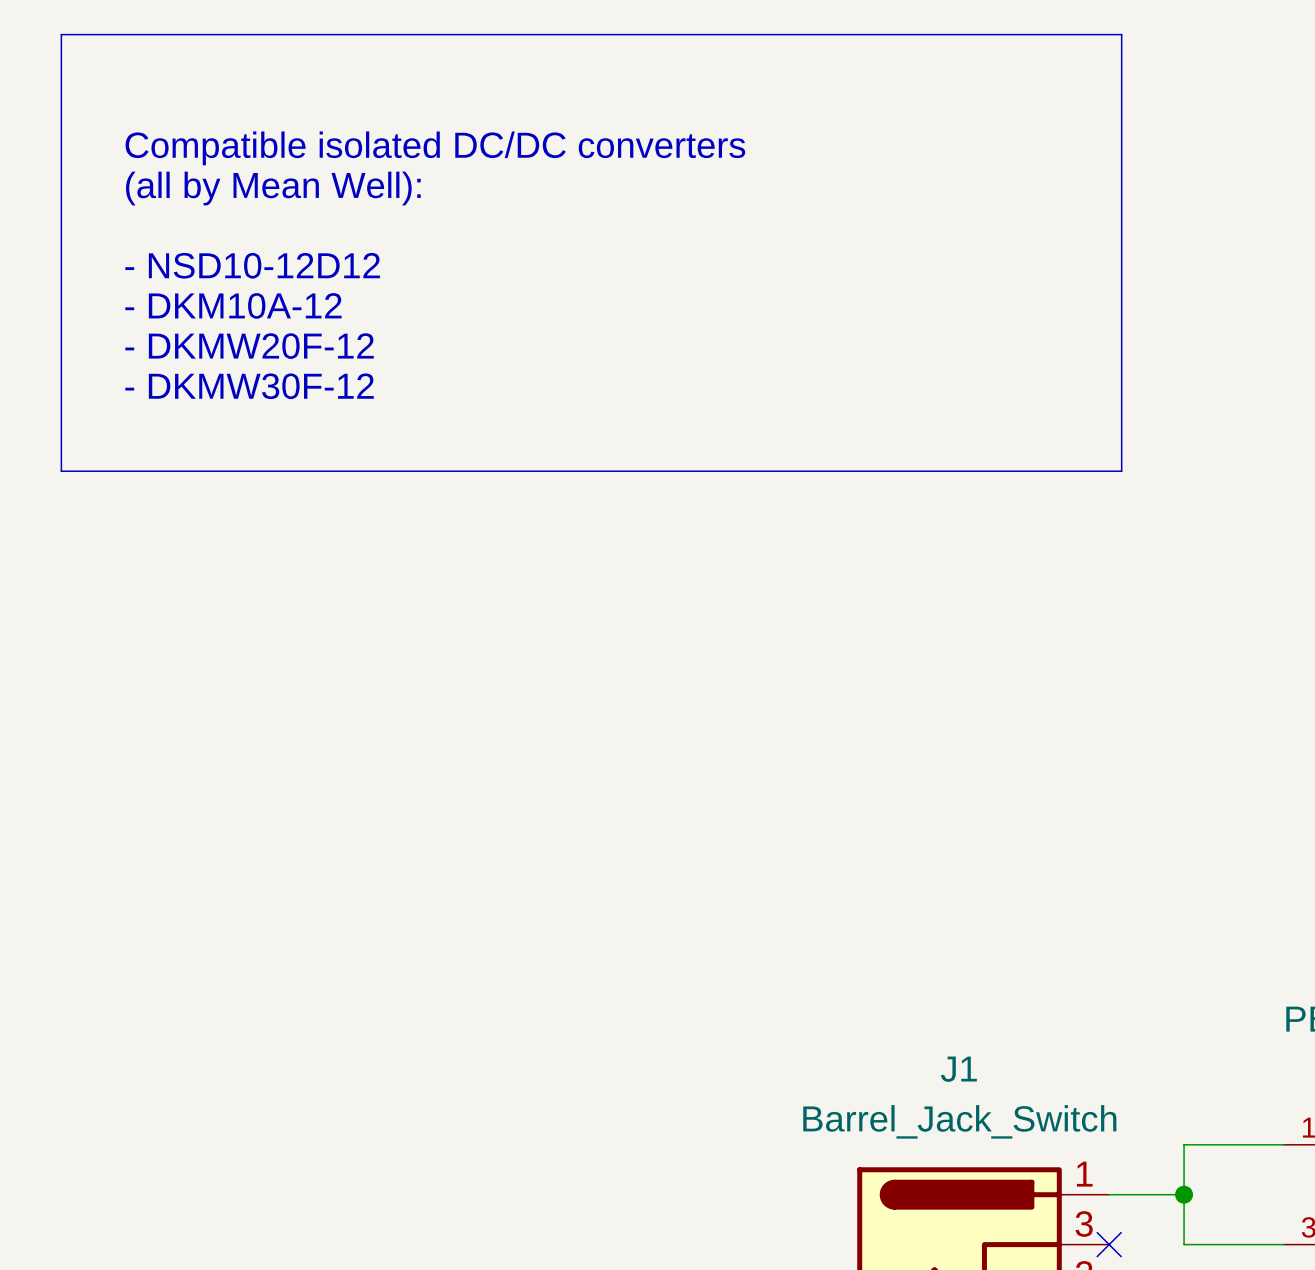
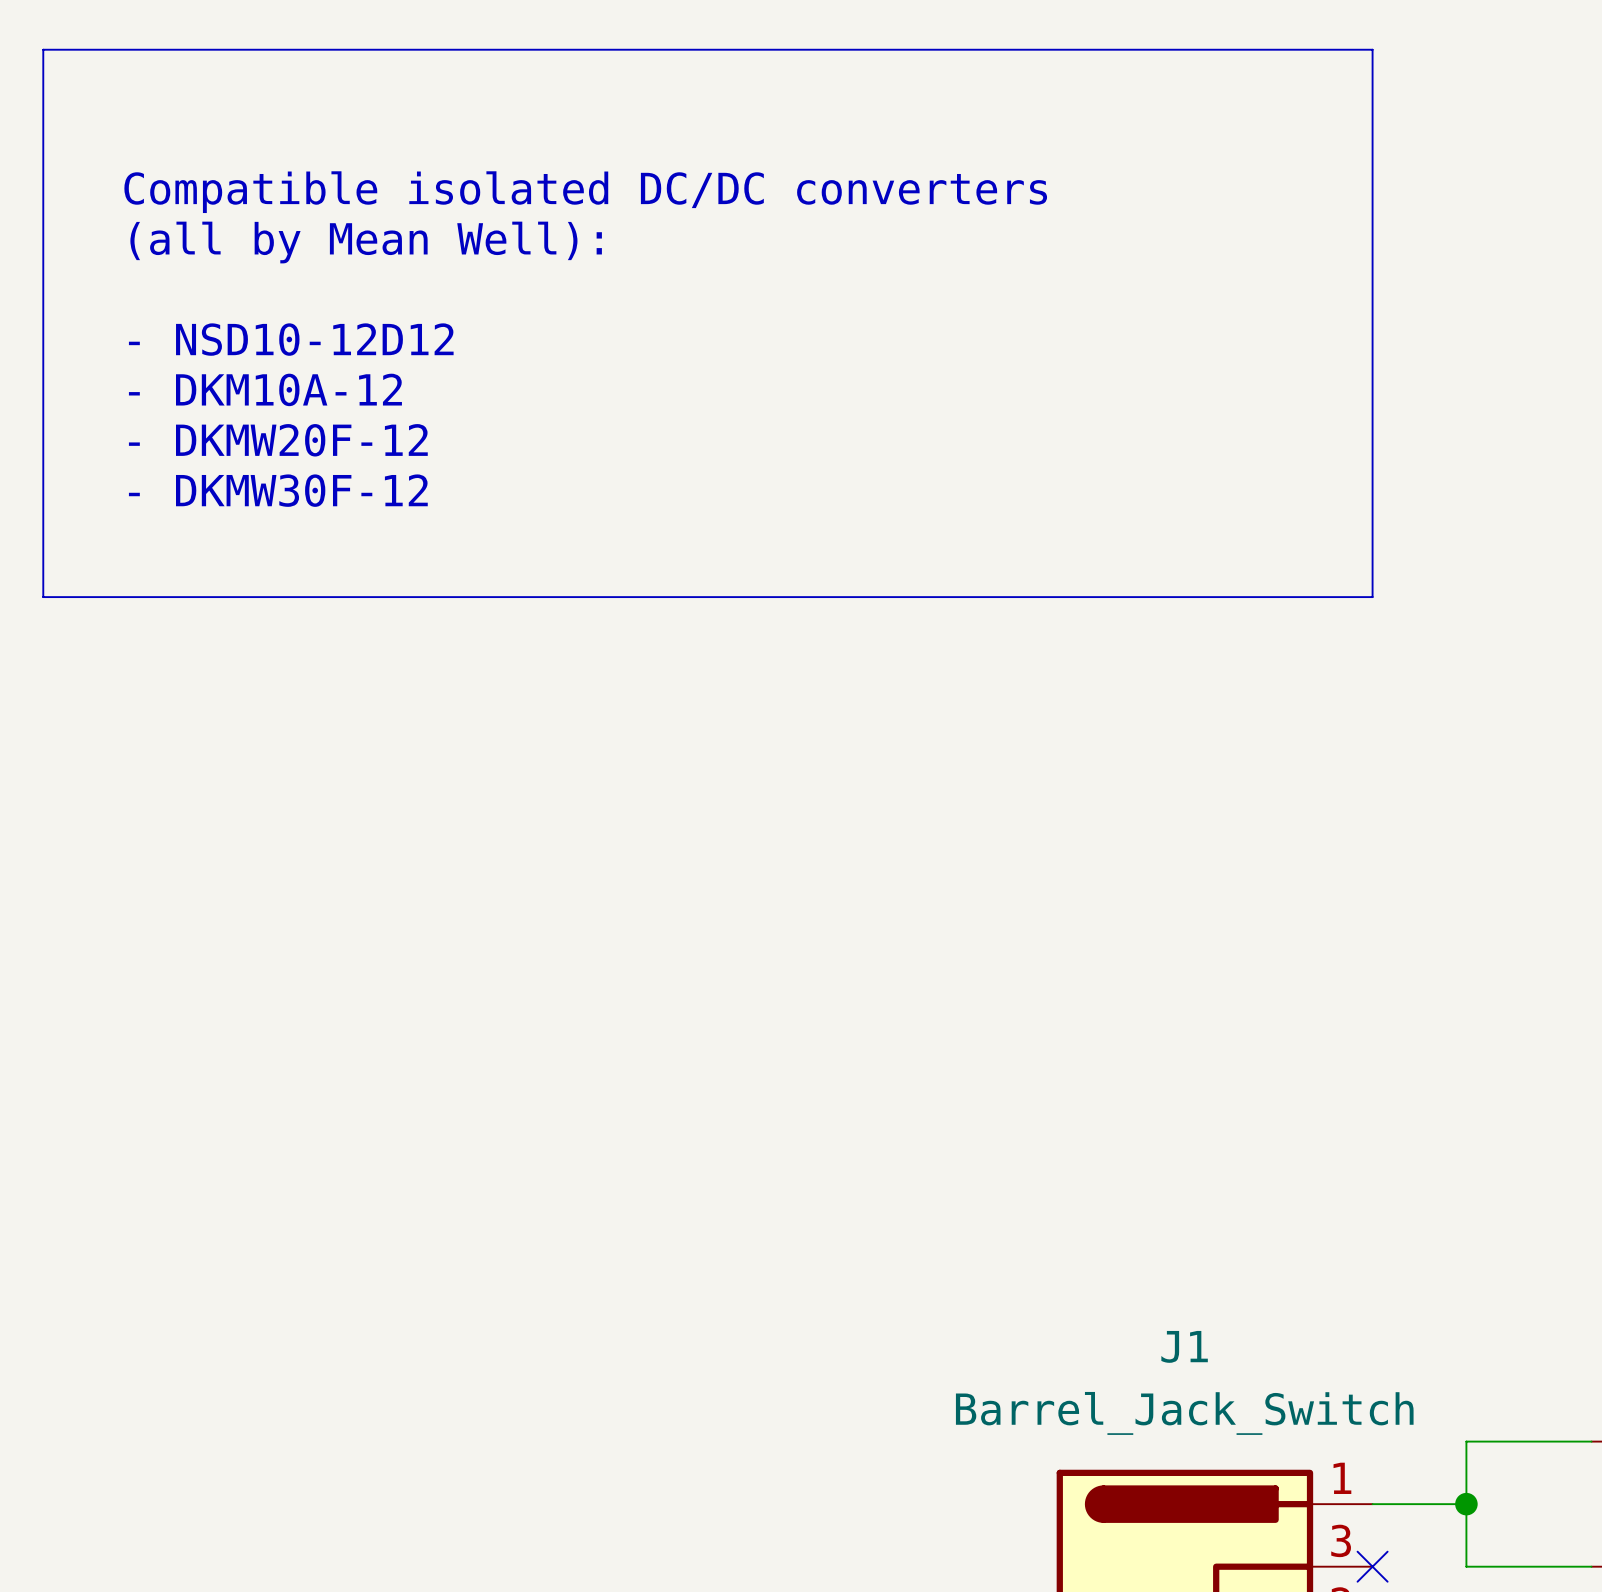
line: (61, 34) (61, 471) -> (58, 49) (43, 49) (43, 597) (58, 597)
line: (1109, 34) (1121, 34) (1121, 471) (1109, 471) -> (1372, 49) (1372, 597)
text position: Compatible isolated DC/DC converters (435, 148) -> Compatible isolated DC/DC converters (585, 192)
text position: (all by Mean Well): (273, 188) -> (all by Mean Well): (366, 242)
text position: - NSD10-12D12 (252, 265) -> - NSD10-12D12 (291, 339)
text position: - DKM10A-12 (233, 305) -> - DKM10A-12 (265, 389)
text position: - DKMW20F-12 (249, 346) -> - DKMW20F-12 (278, 440)
text position: - DKMW30F-12 (249, 386) -> - DKMW30F-12 (278, 490)

